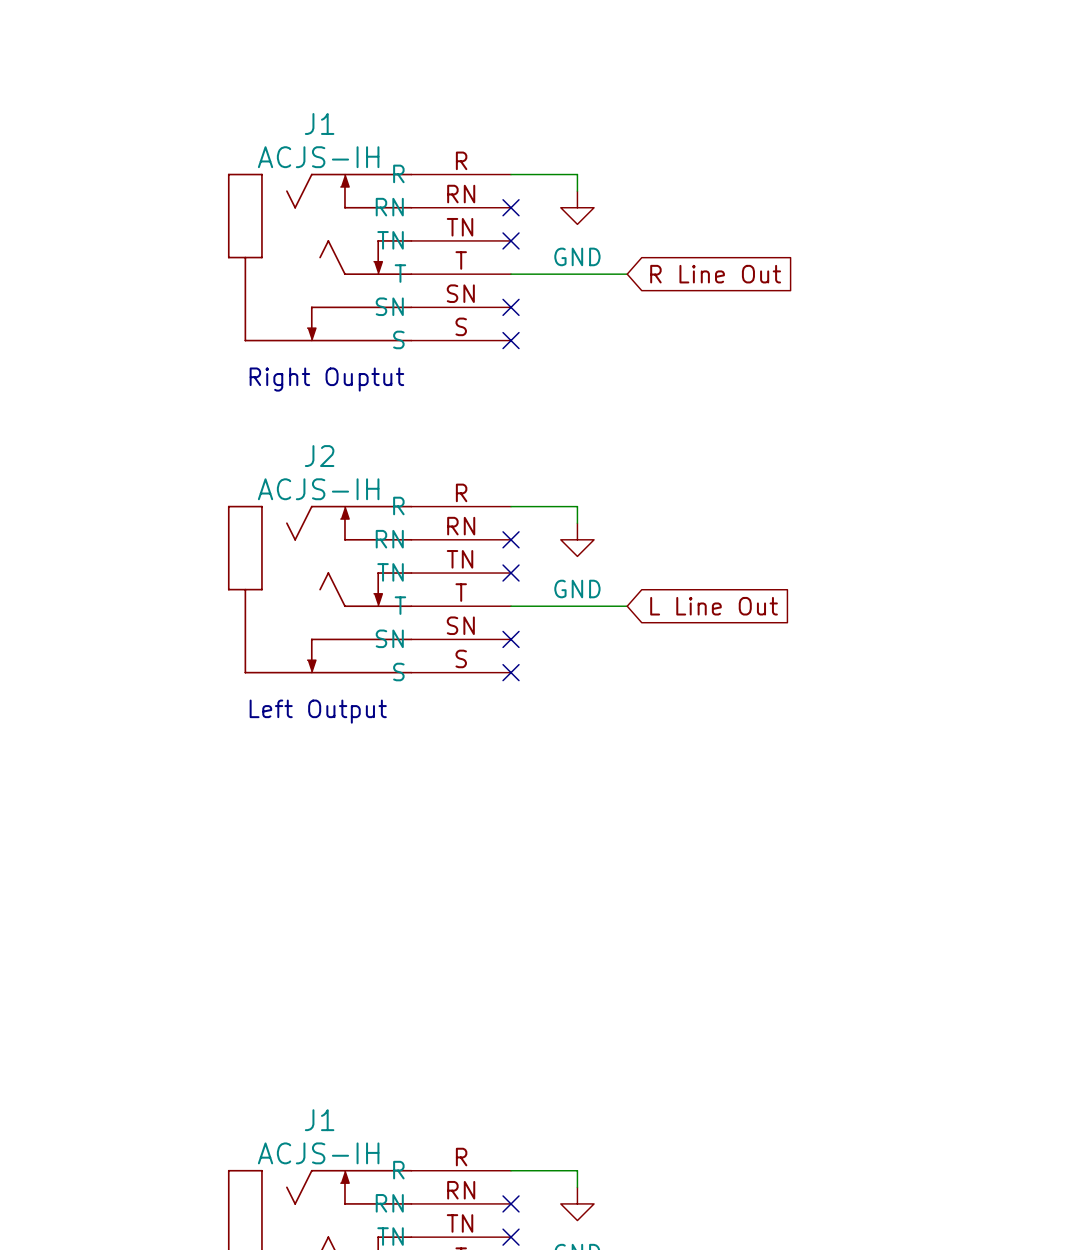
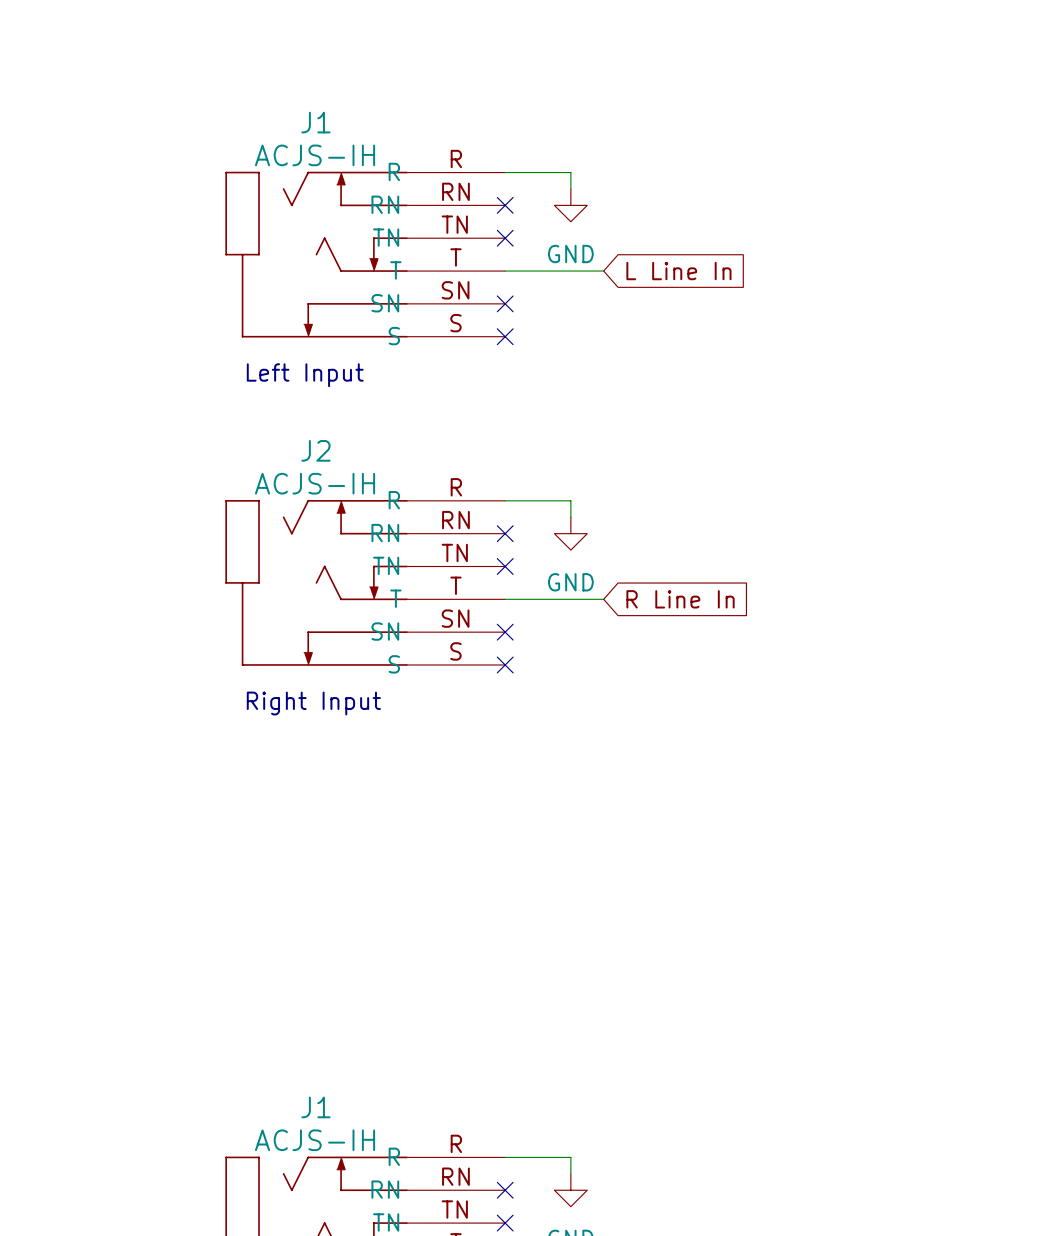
wire: (610, 274) (627, 274) -> none
global label: R Line Out (715, 274) -> L Line In (678, 271)
text: Right Ouptut (326, 379) -> Left Input (305, 375)
wire: (610, 606) (627, 606) -> none
global label: L Line Out (714, 606) -> R Line In (680, 599)
text: Left Output (318, 711) -> Right Input (313, 703)

